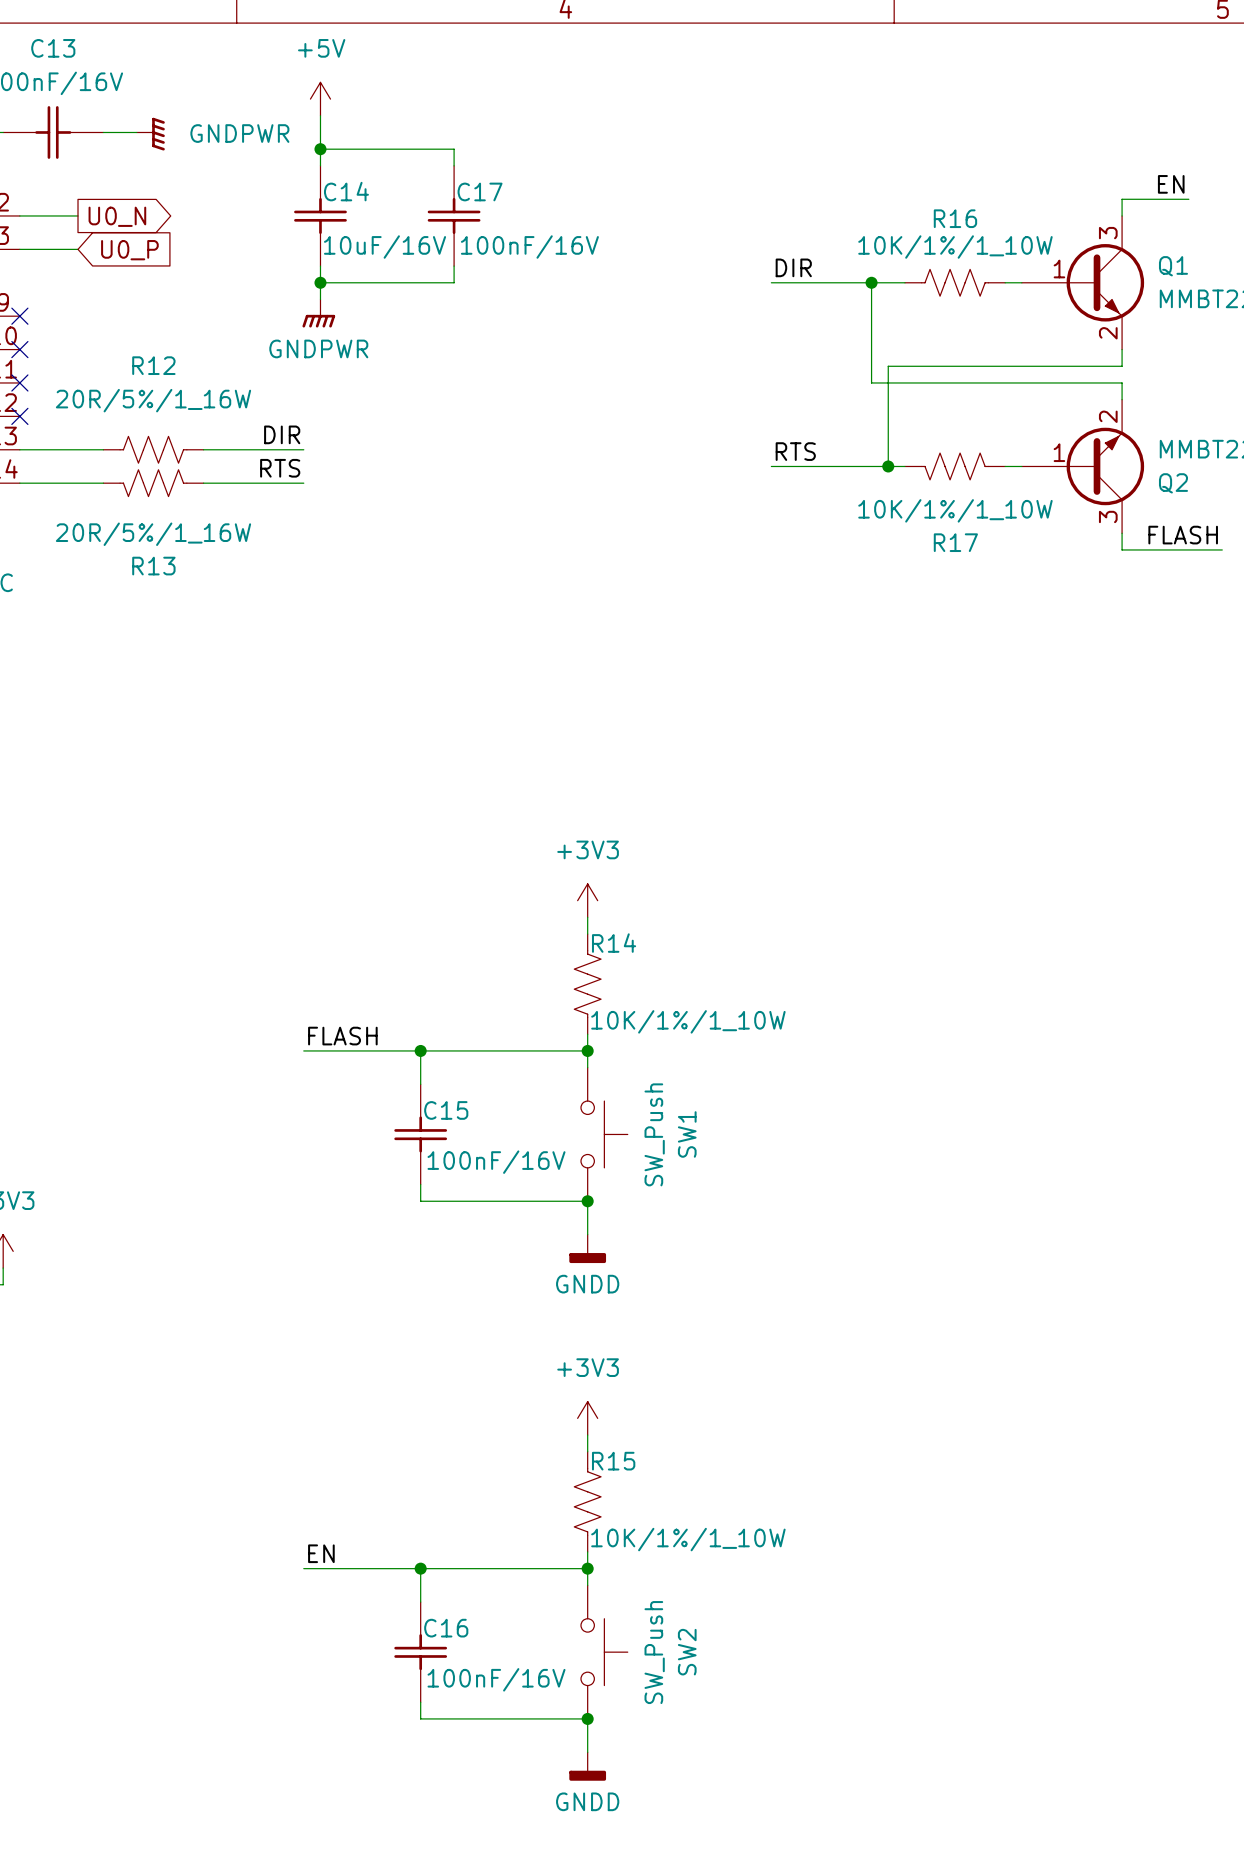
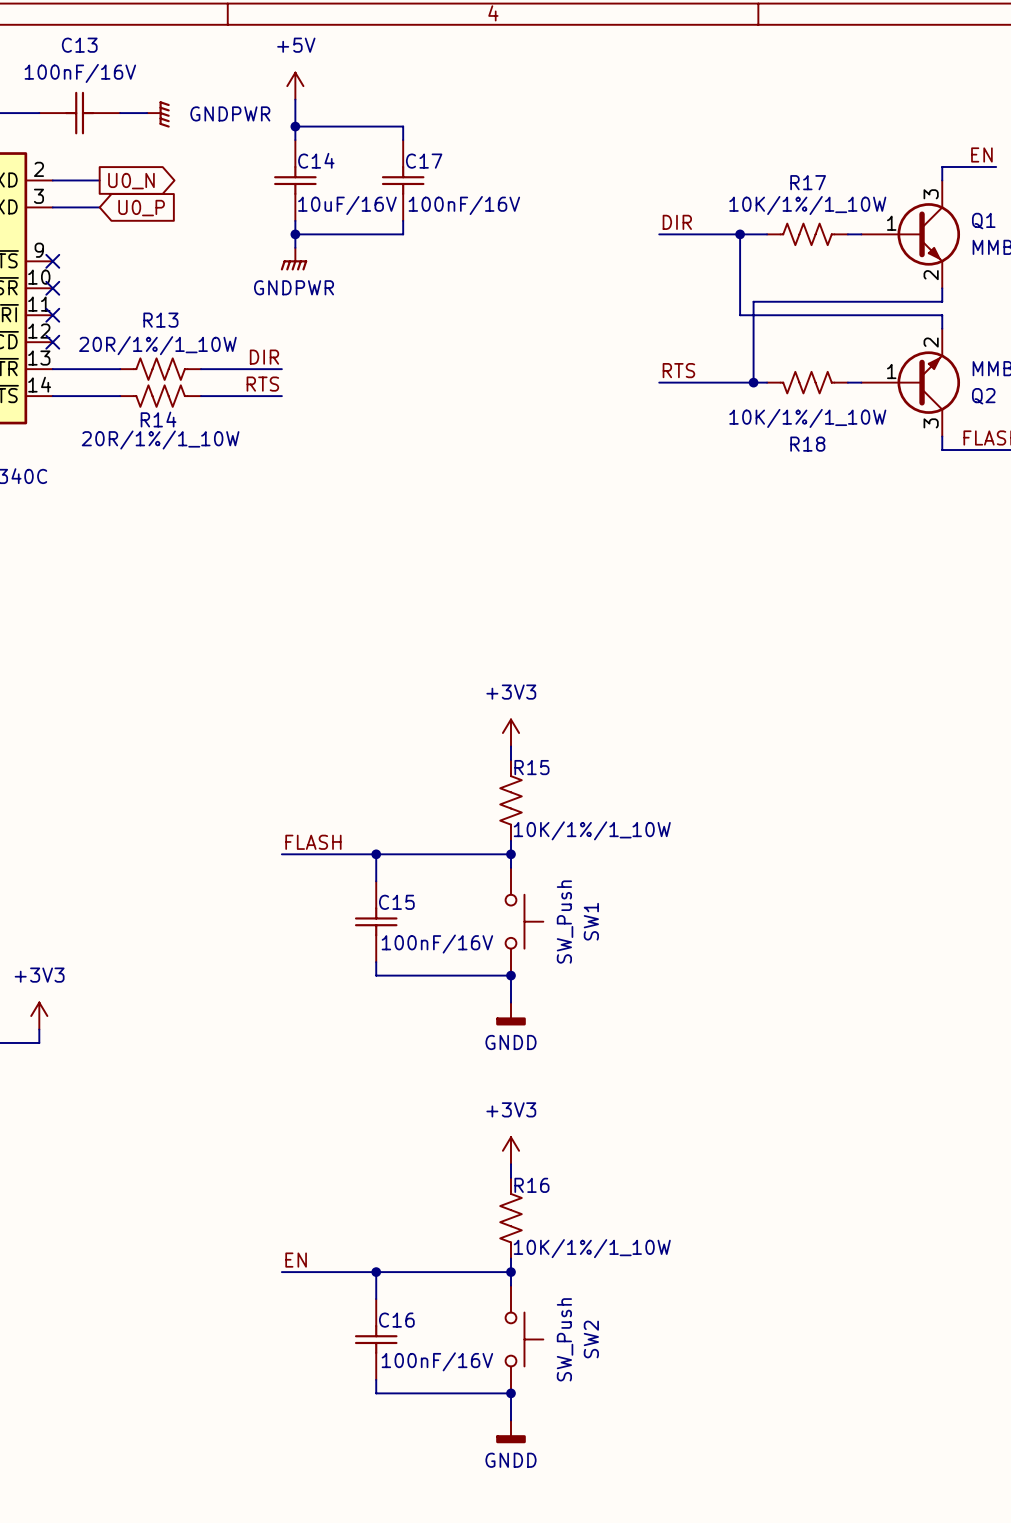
R16 name: R16 (955, 218) -> R17 (808, 182)
R12 name: R12 (153, 365) -> R13 (160, 320)
R12 value: 20R/5%/1_16W (153, 400) -> 20R/1%/1_10W (157, 345)
R13 value: 20R/5%/1_16W (153, 534) -> 20R/1%/1_10W (160, 440)
R17 name: R17 (955, 542) -> R18 (807, 444)
R13 name: R13 (153, 566) -> R14 (158, 419)
R14 name: R14 (614, 943) -> R15 (531, 767)
R15 name: R15 (613, 1461) -> R16 (531, 1185)

